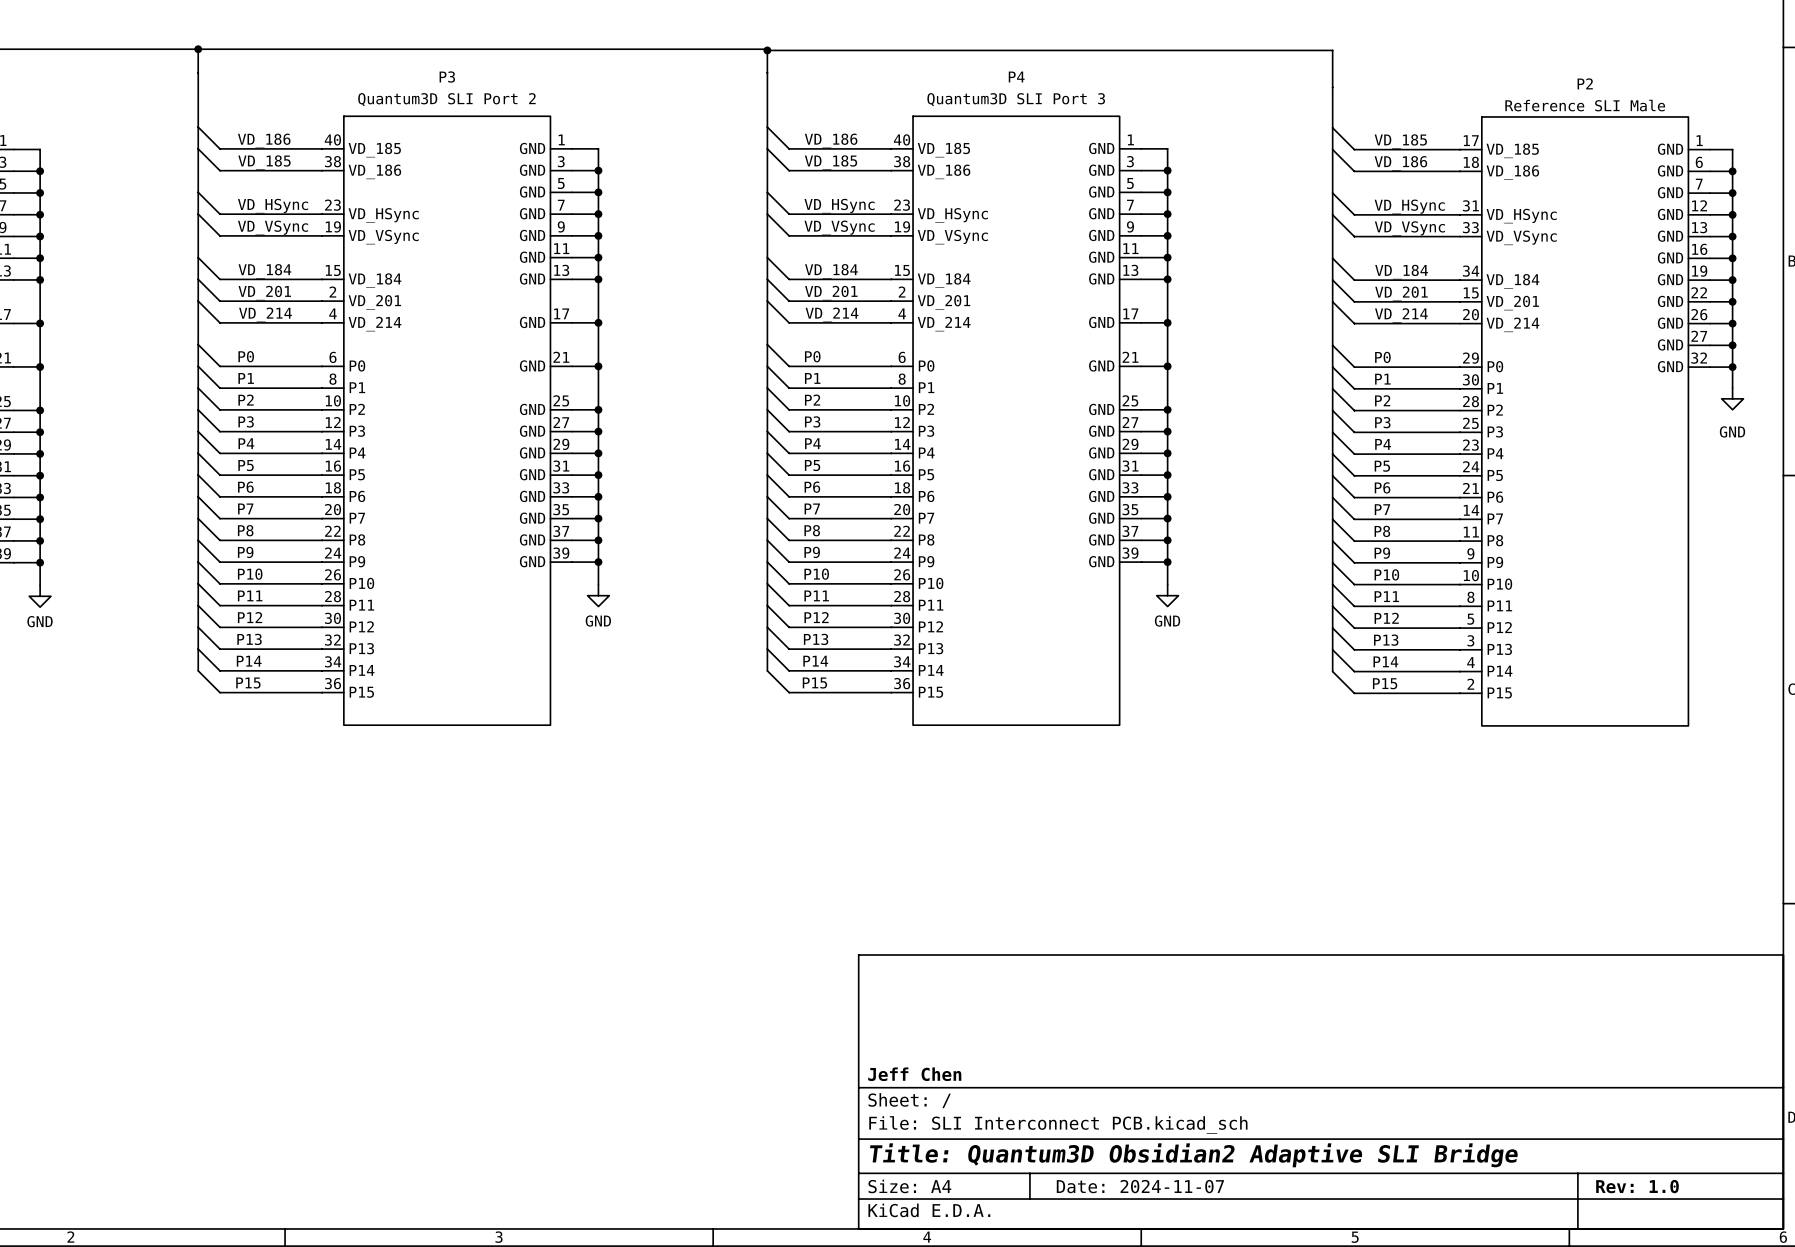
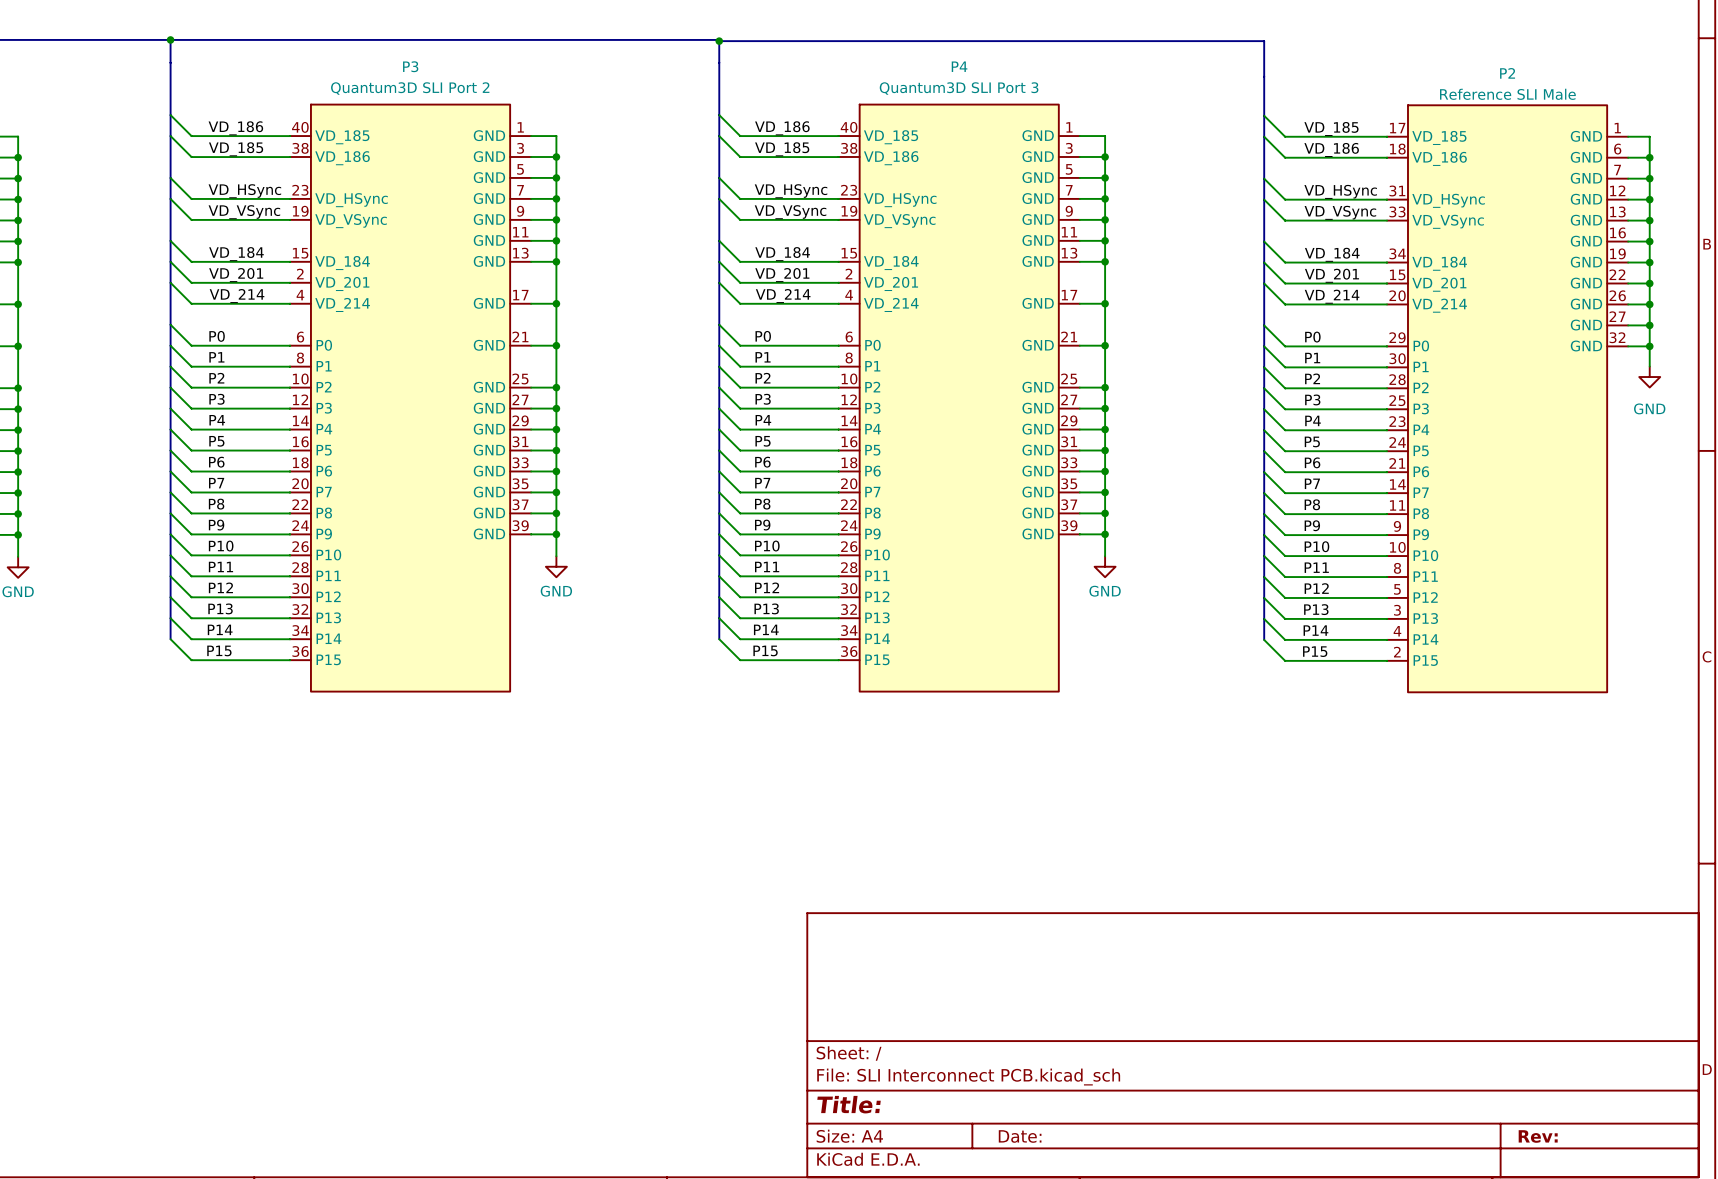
title block: Jeff Chen (914, 1074) -> none
title block: Title: Quantum3D Obsidian2 Adaptive SLI Bridge (1194, 1155) -> Title: (849, 1104)
title block: Date: 2024-11-07 (1140, 1186) -> Date: (1020, 1136)
title block: Rev: 1.0 (1637, 1186) -> Rev: (1538, 1136)

